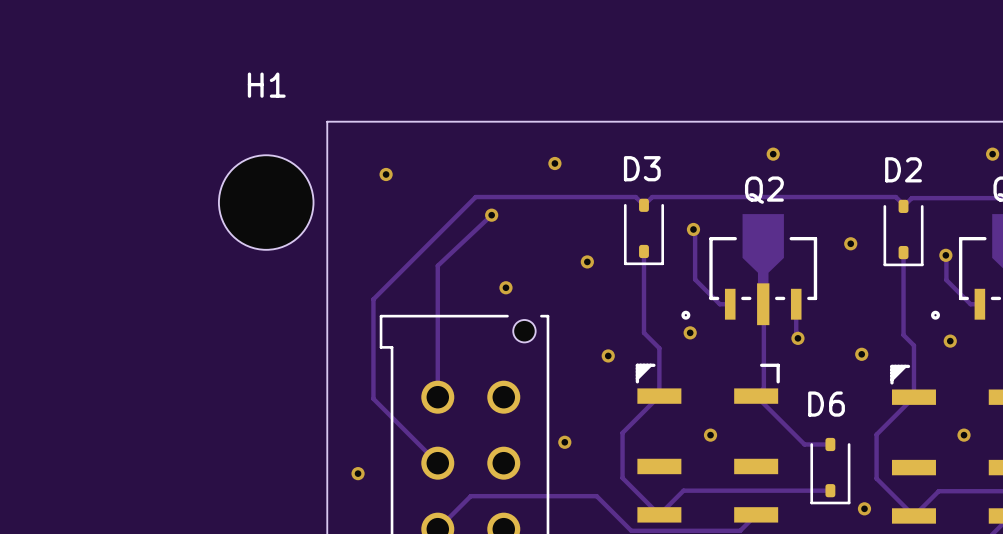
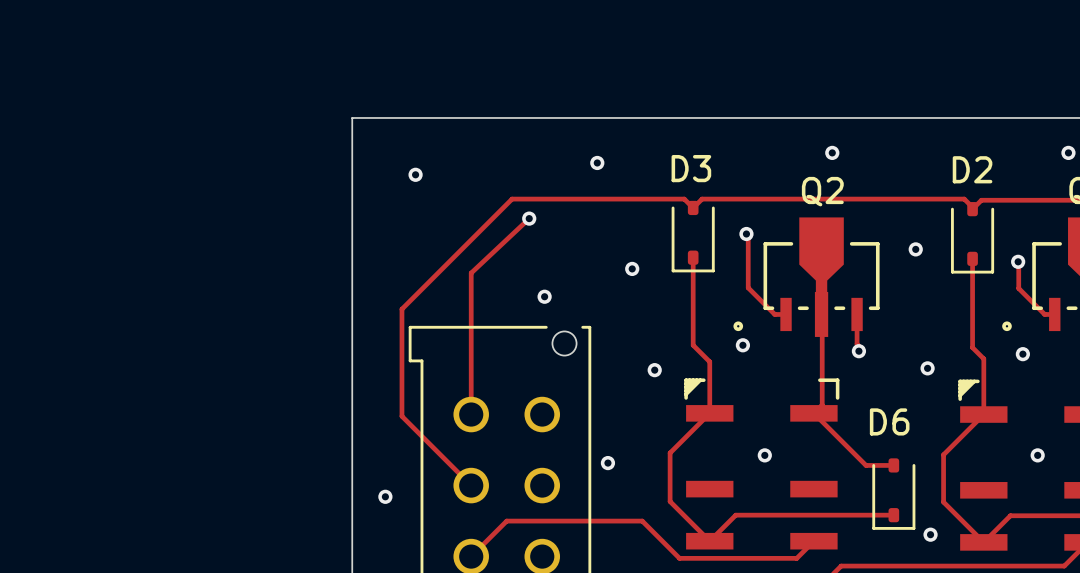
H1: (266, 202) -> none

